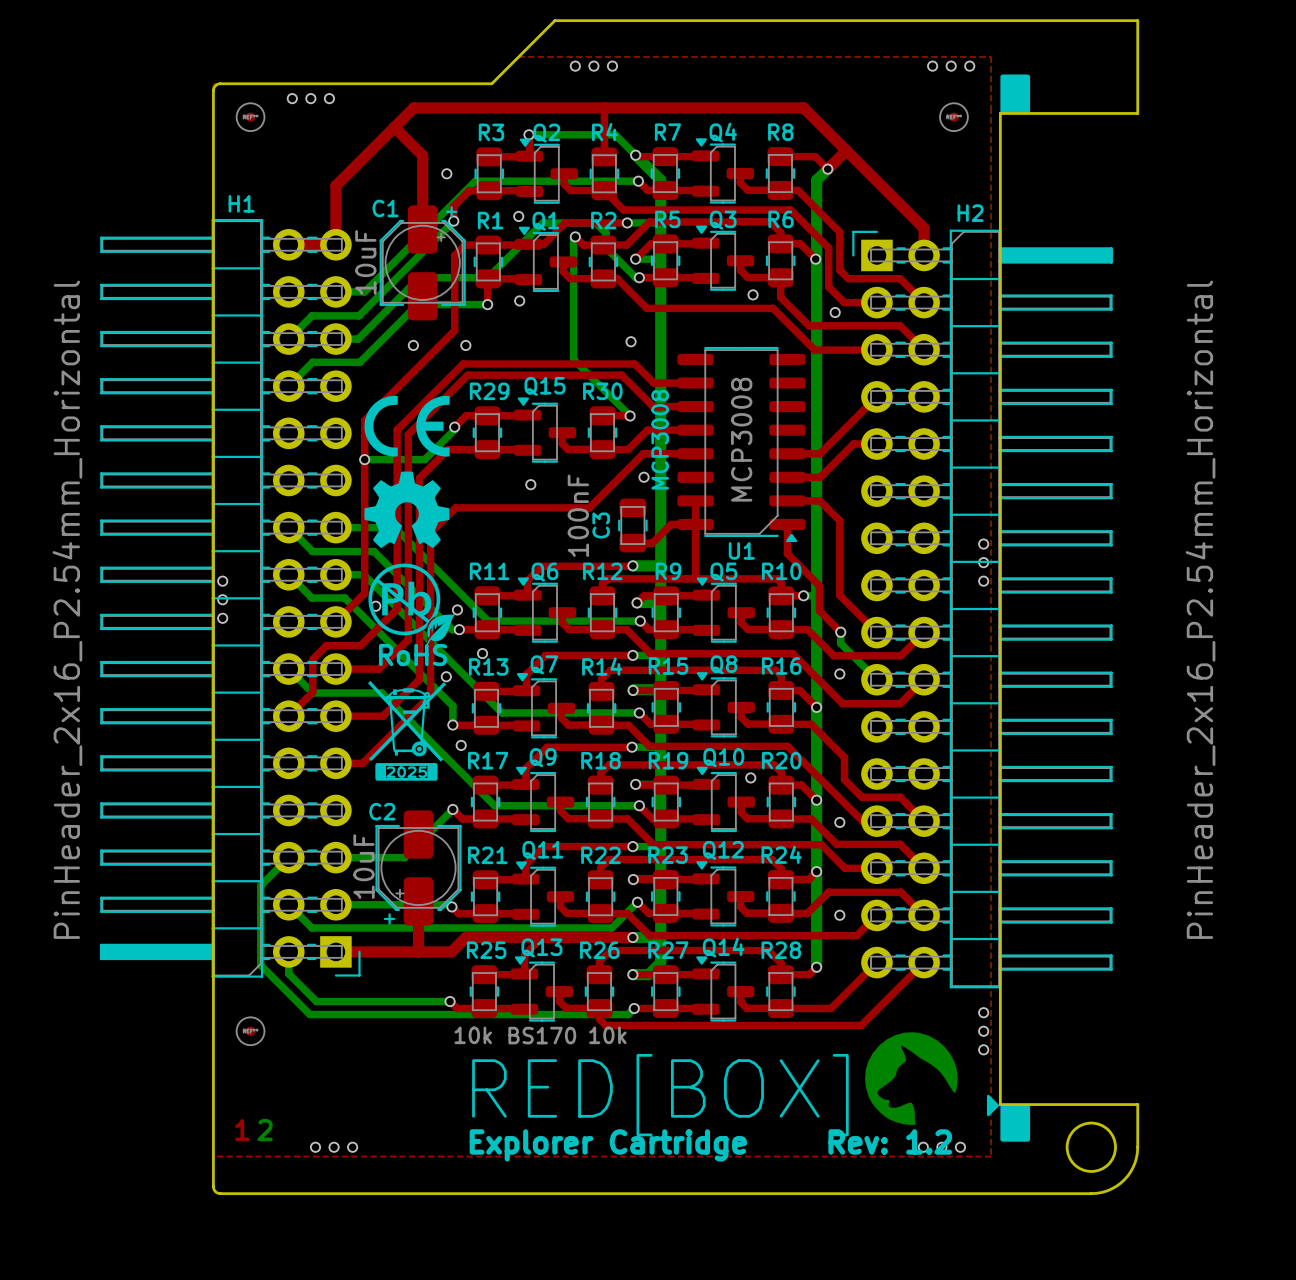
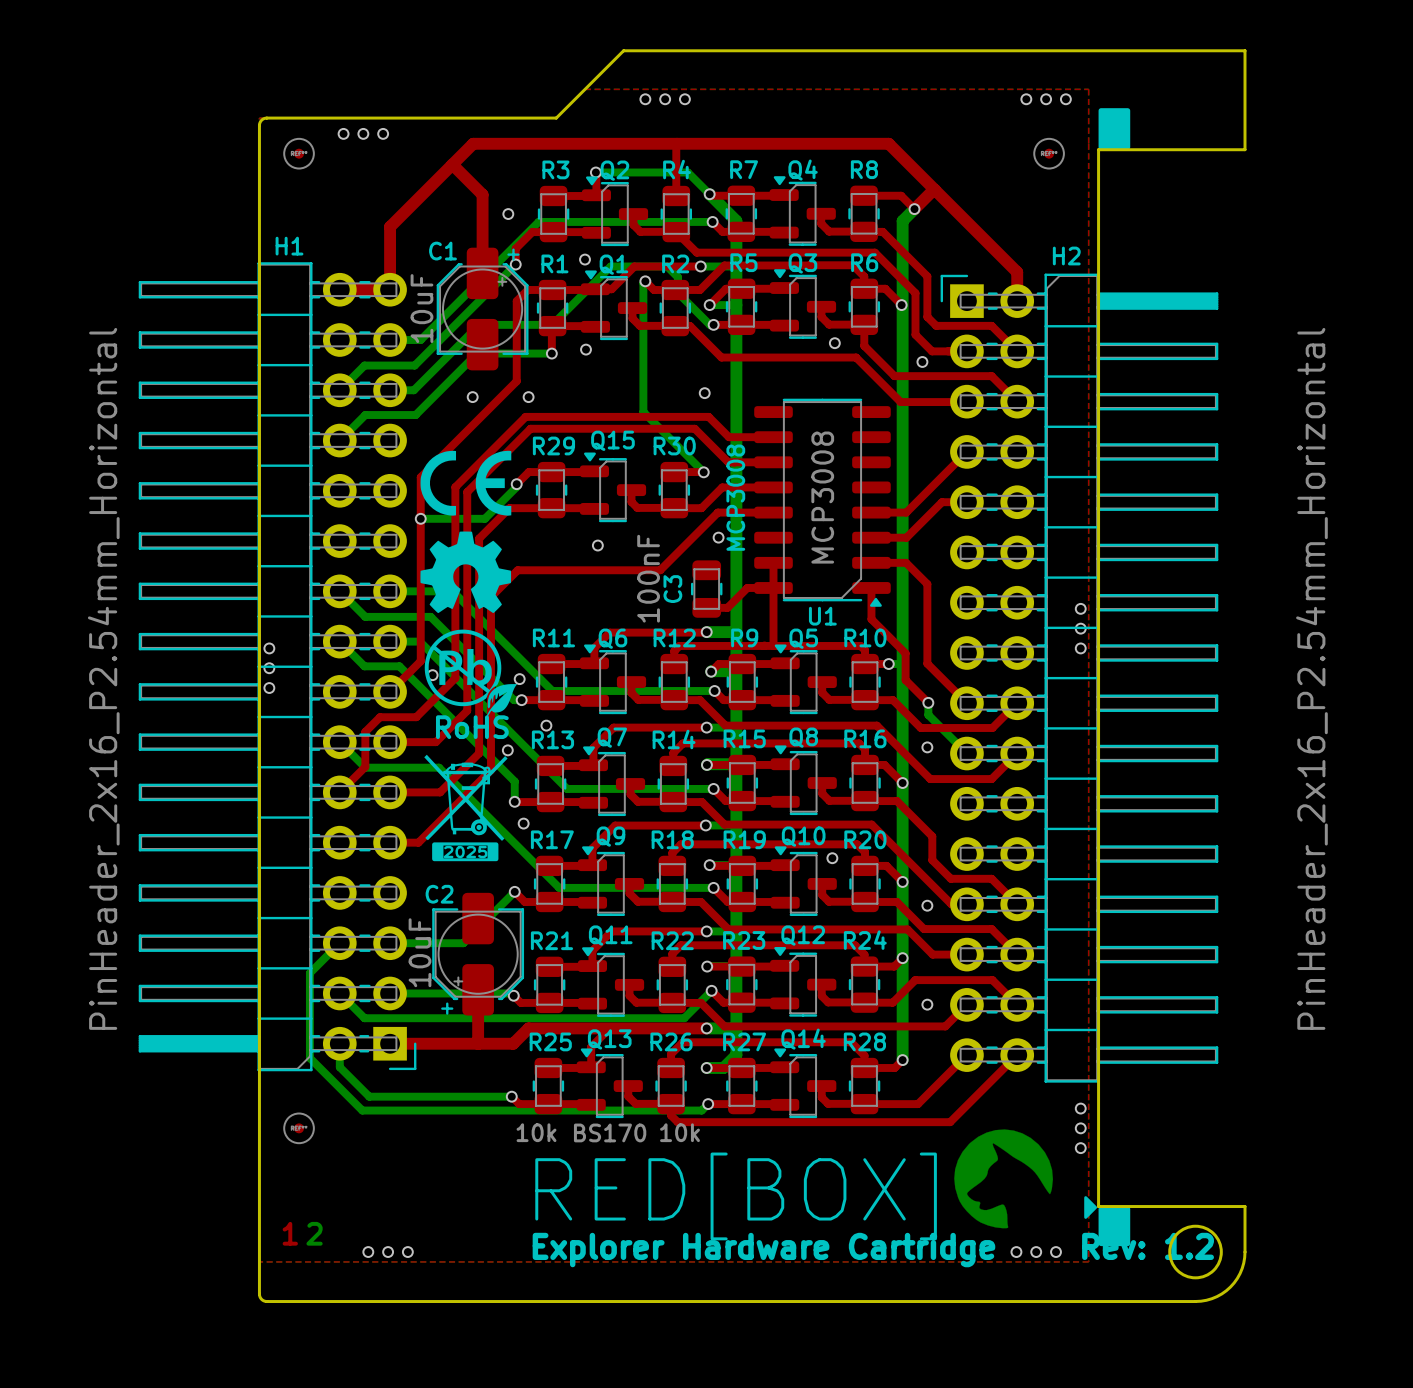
text: Explorer Cartridge Rev: 1.2 (710, 1145) -> Explorer Hardware Cartridge Rev: 1.2 (873, 1250)

